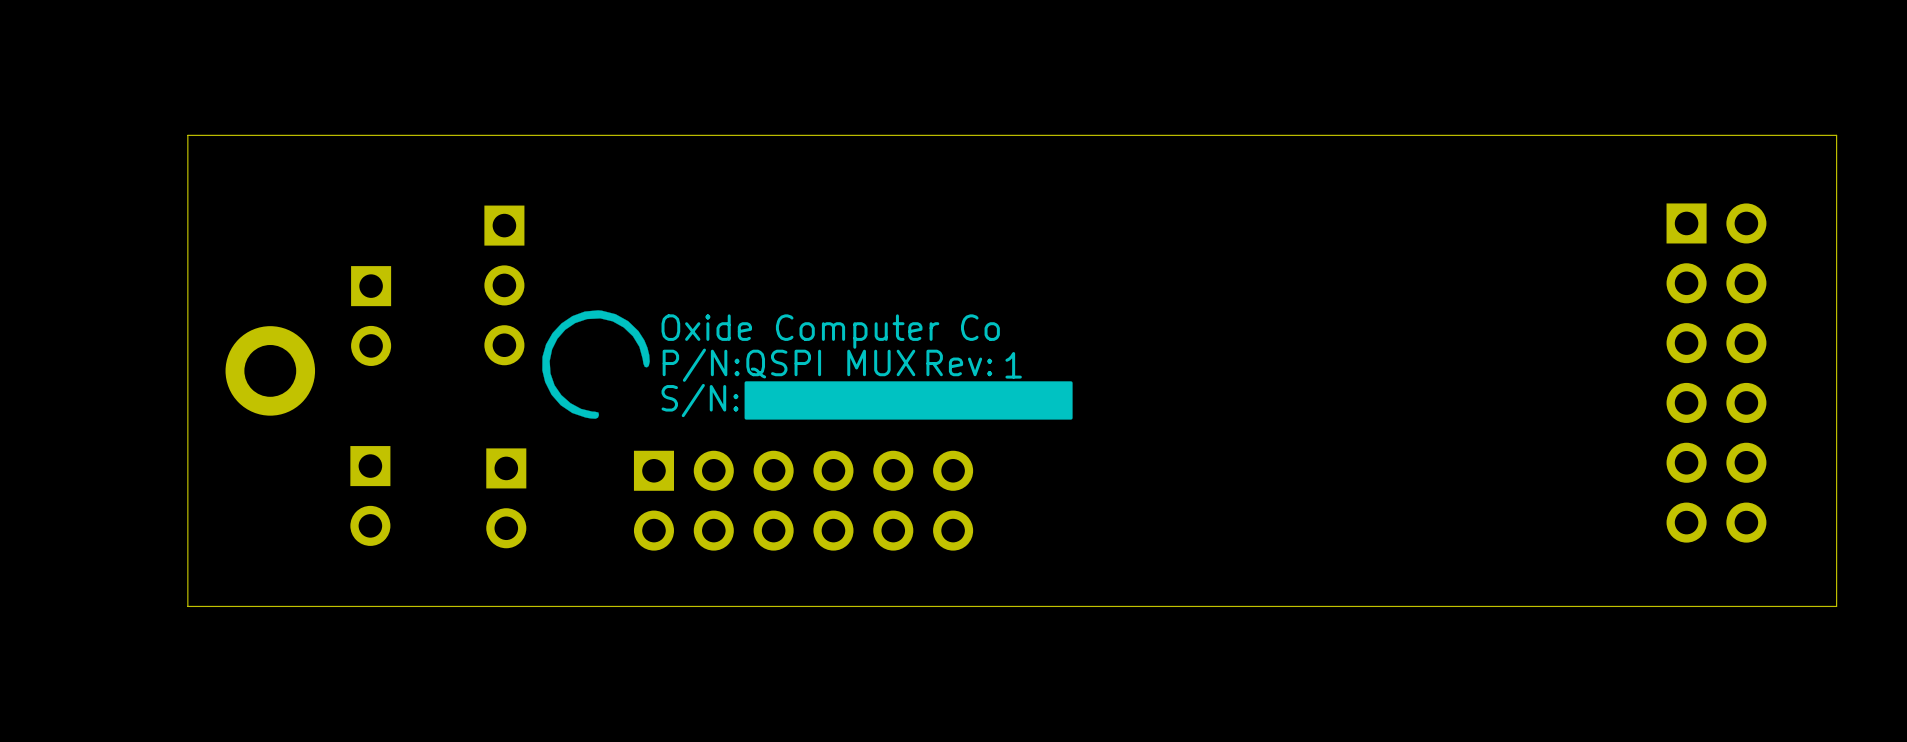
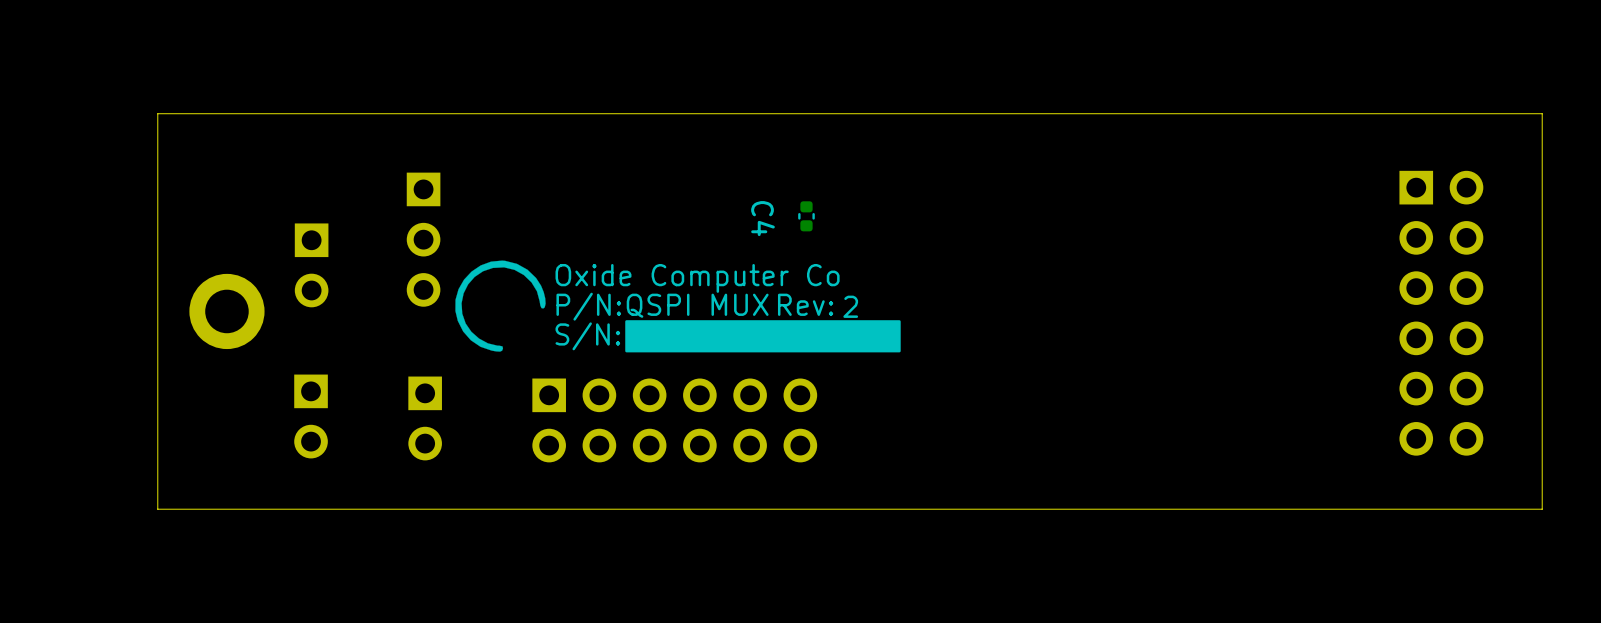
C4: none -> (806, 216)
drawing shape: [542, 310, 1073, 420] -> [455, 260, 901, 353]

